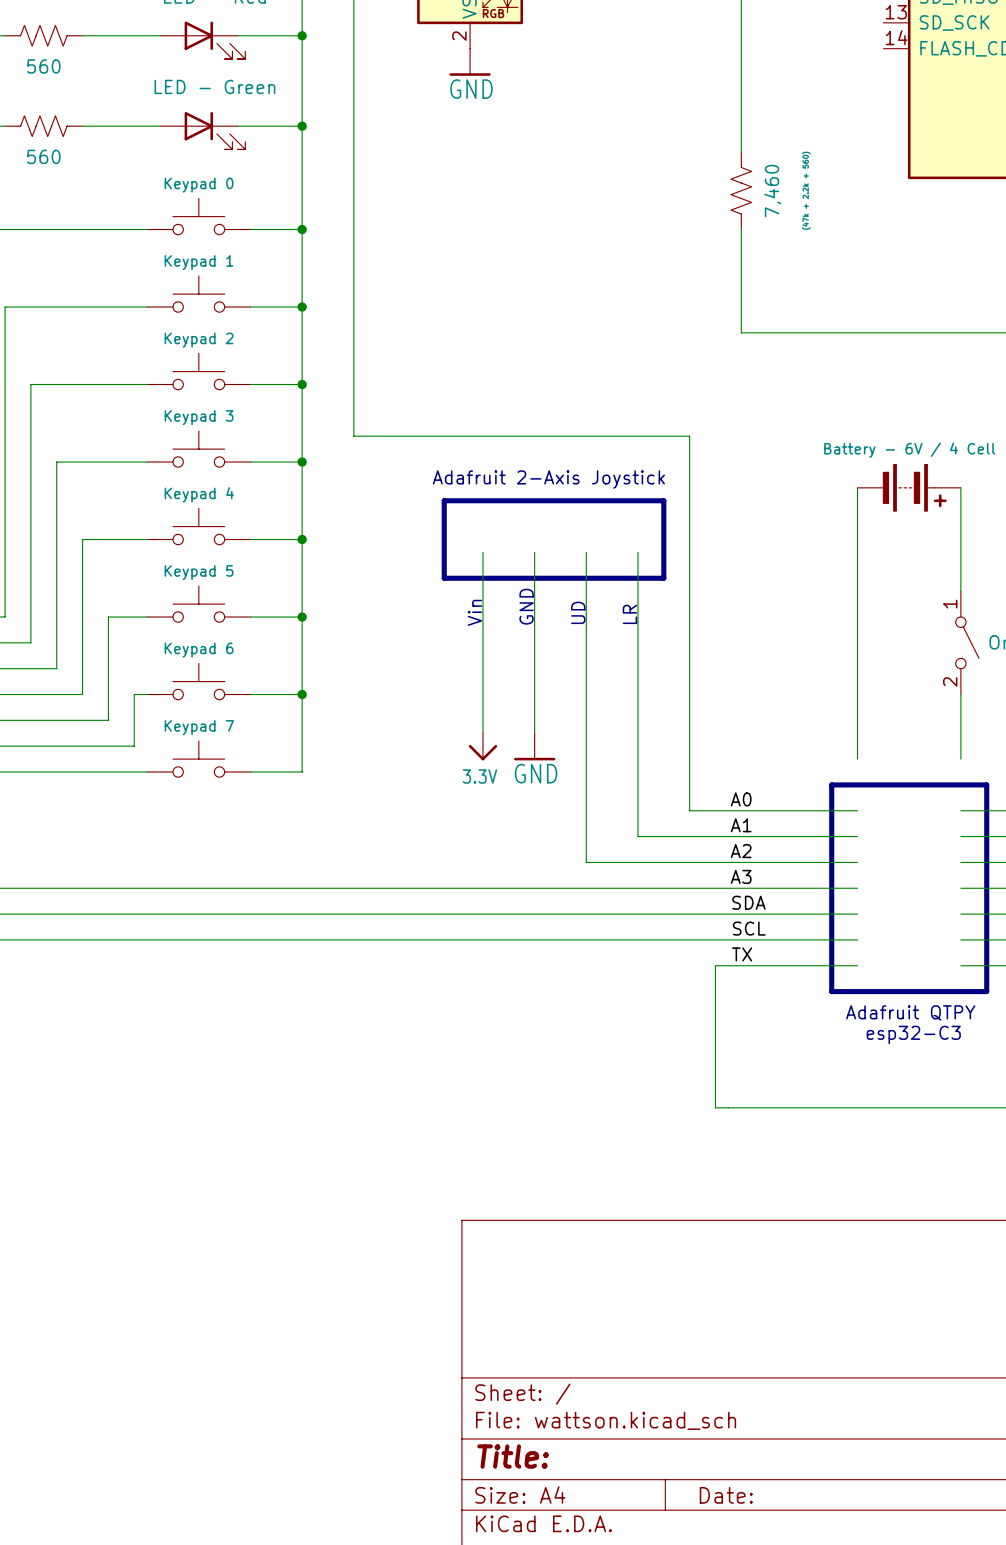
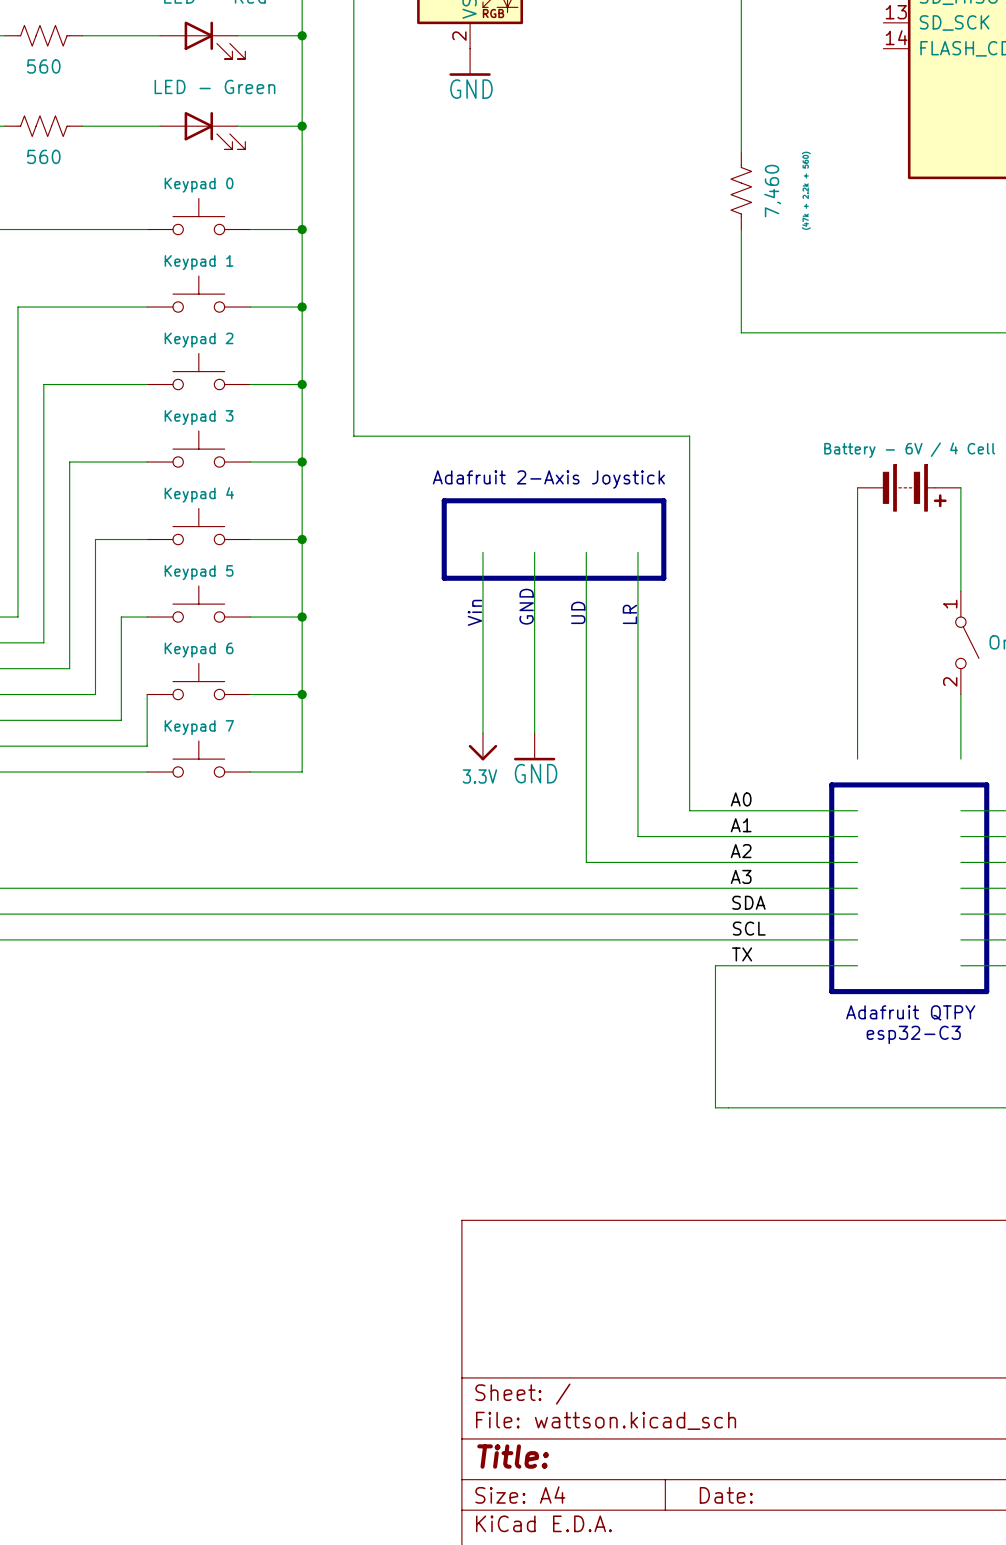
wire: (17, 307) (5, 307) (5, 617) -> (17, 307) (17, 617) (5, 617)
wire: (43, 384) (30, 384) (30, 642) -> (43, 384) (43, 642) (30, 642)
wire: (69, 462) (56, 462) (56, 668) -> (69, 462) (69, 668) (56, 668)
wire: (95, 539) (82, 539) (82, 694) -> (95, 539) (95, 694) (82, 694)
wire: (121, 617) (108, 617) (108, 720) -> (121, 617) (121, 720) (108, 720)
wire: (147, 694) (134, 694) (134, 746) -> (147, 694) (147, 746) (134, 746)

